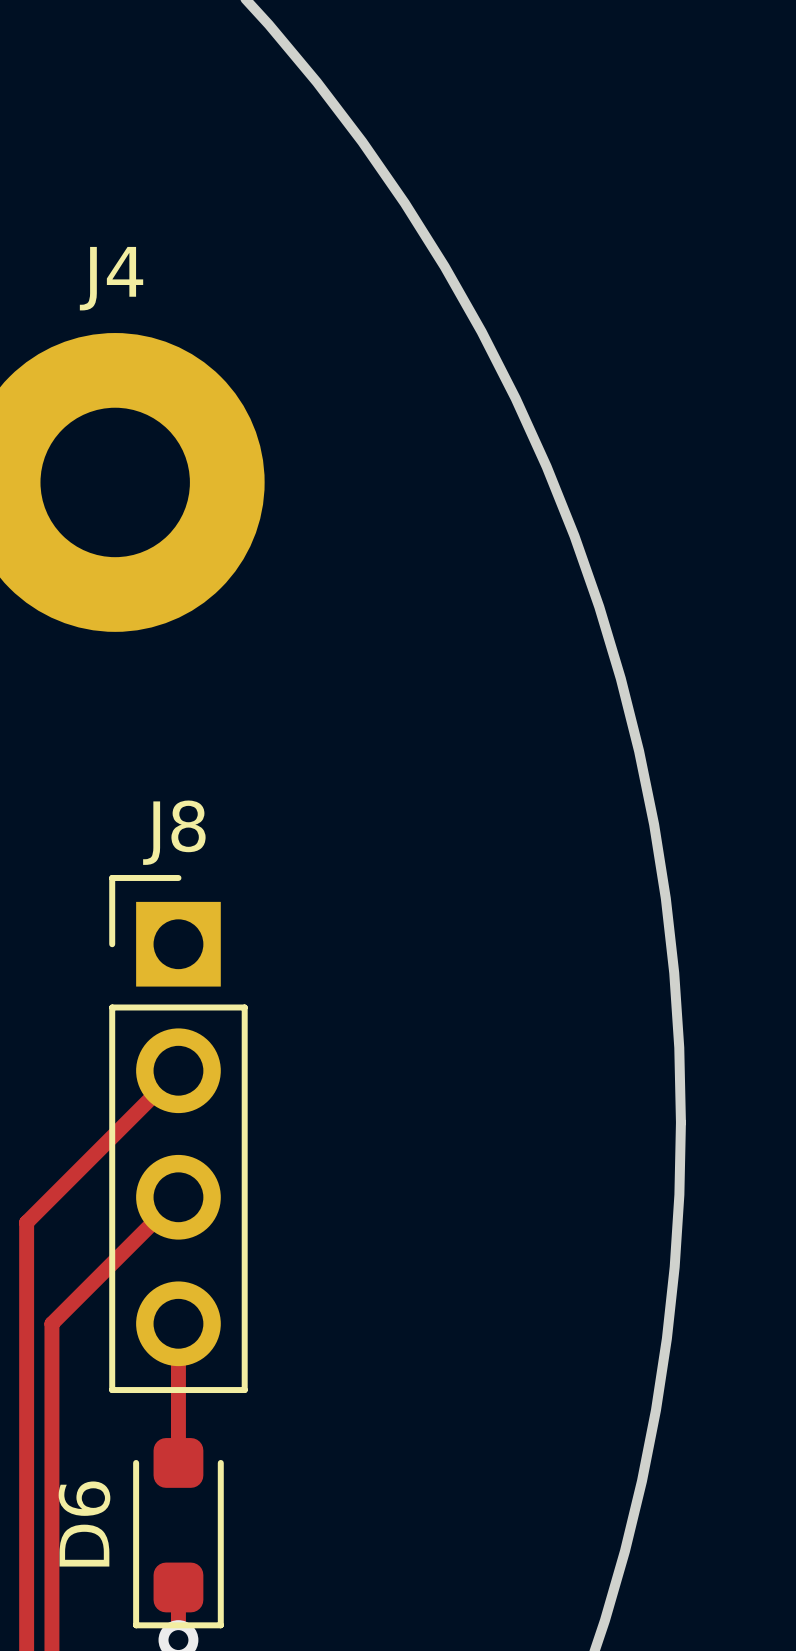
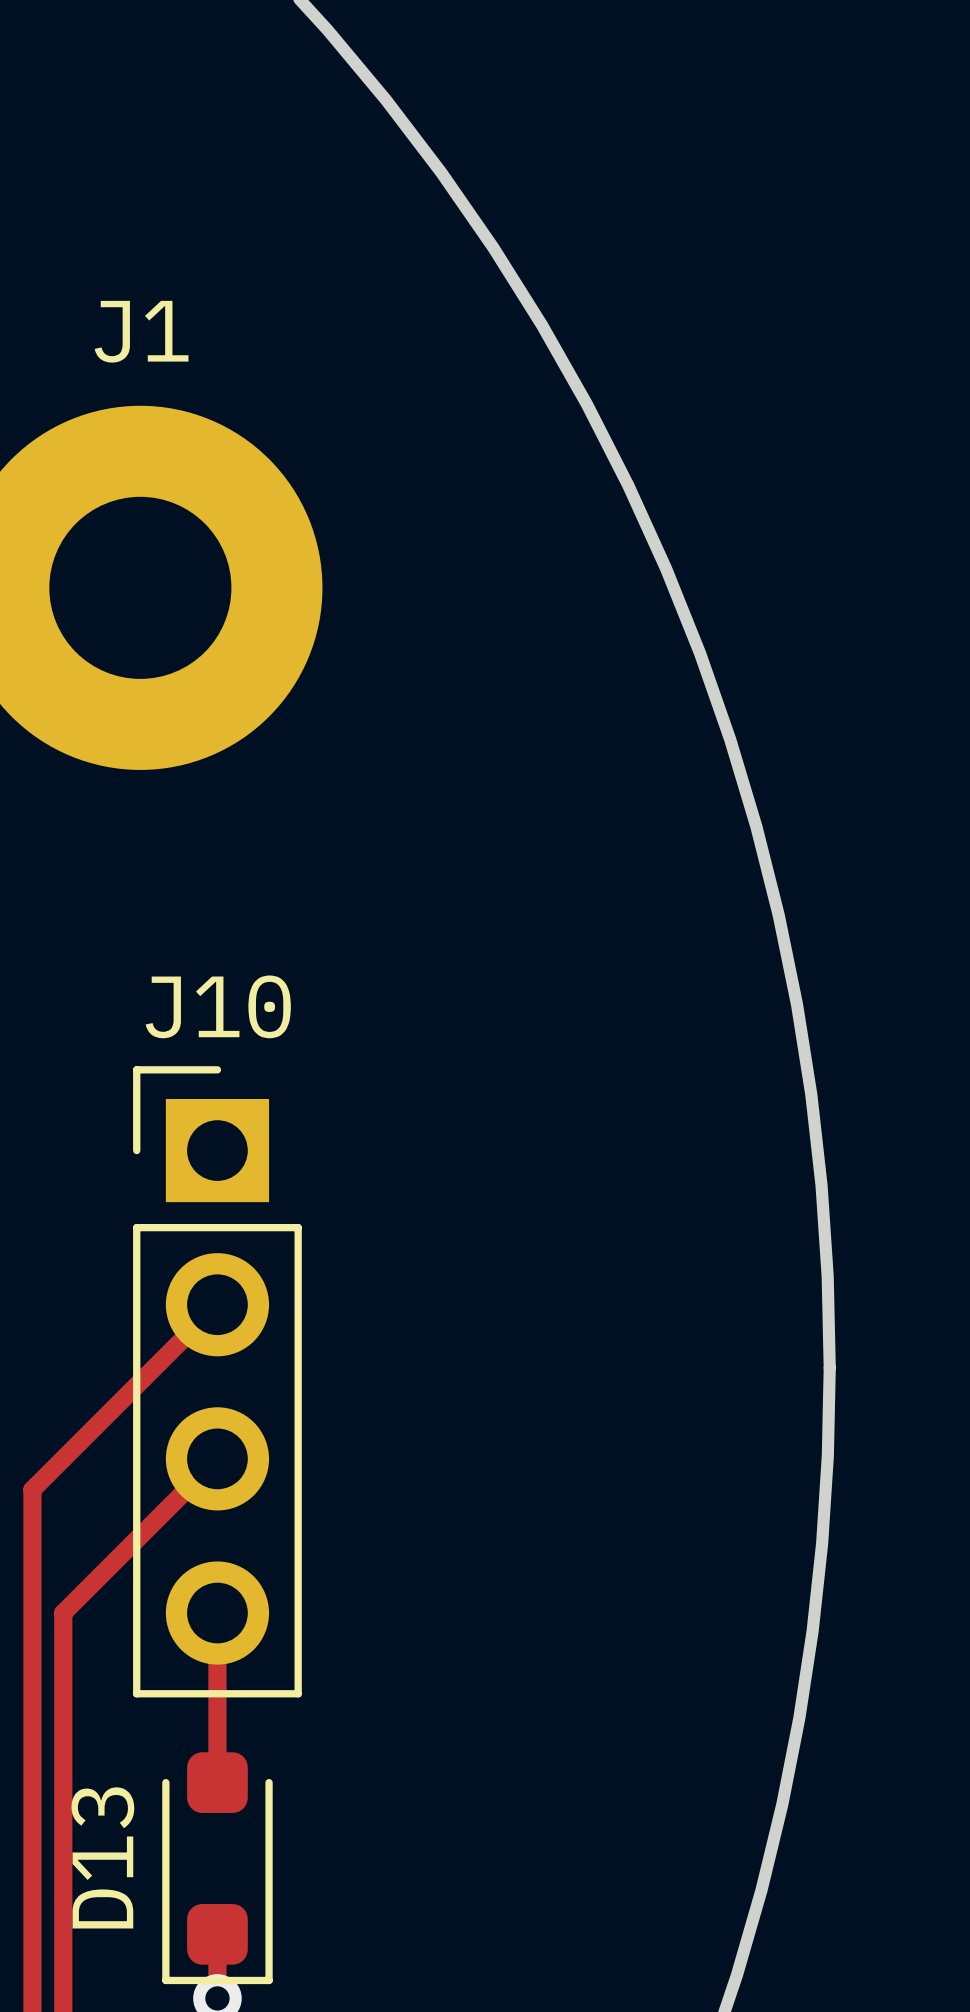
J4 name: J4 (111, 278) -> J1 (141, 331)
J8 name: J8 (174, 832) -> J10 (218, 1006)
D6 name: D6 (84, 1524) -> D13 (102, 1857)

